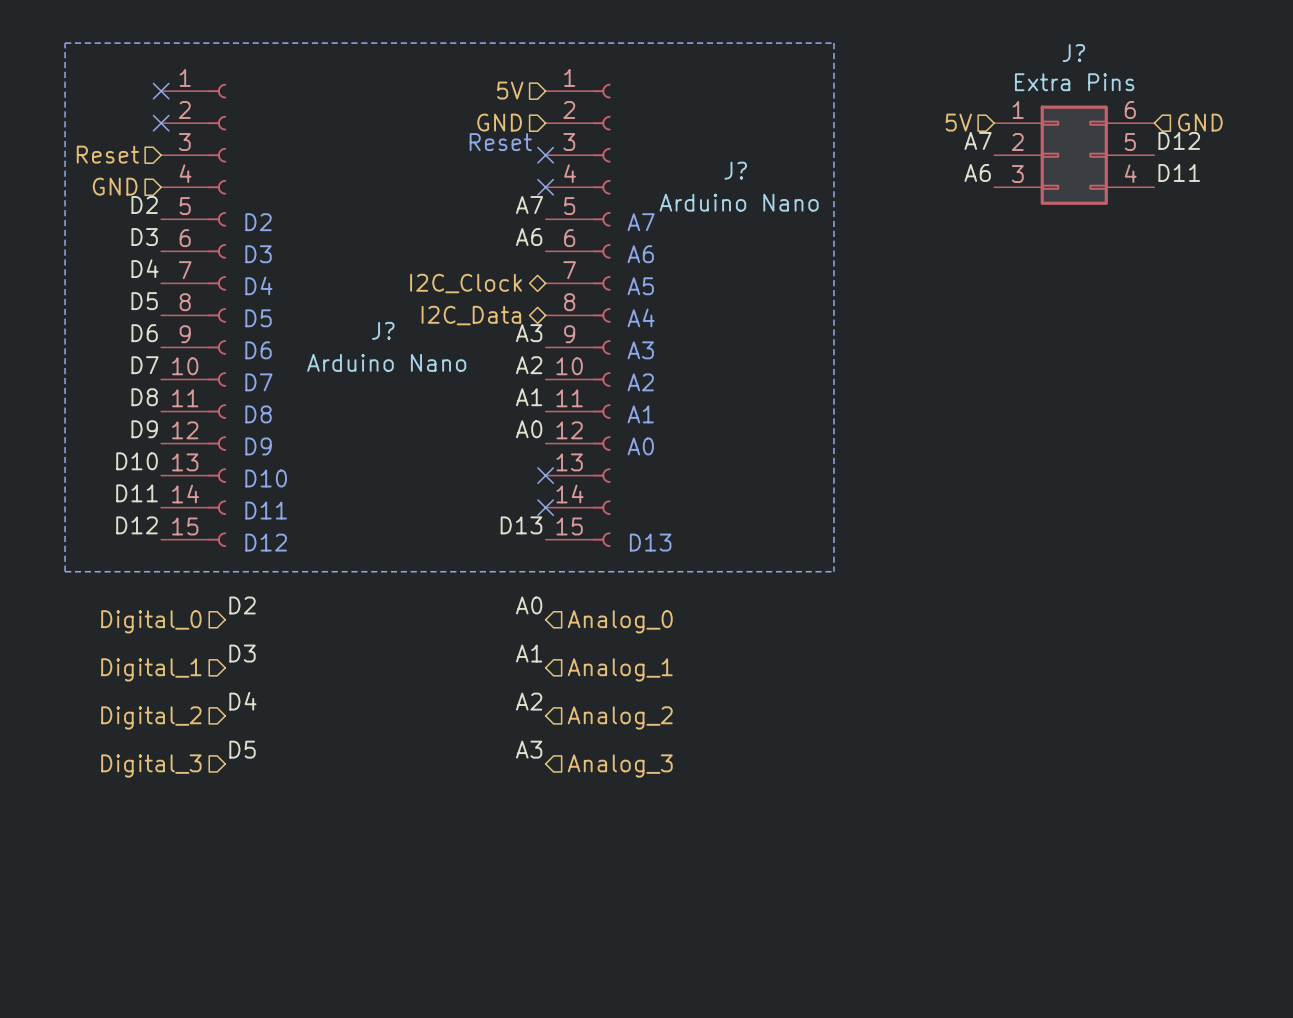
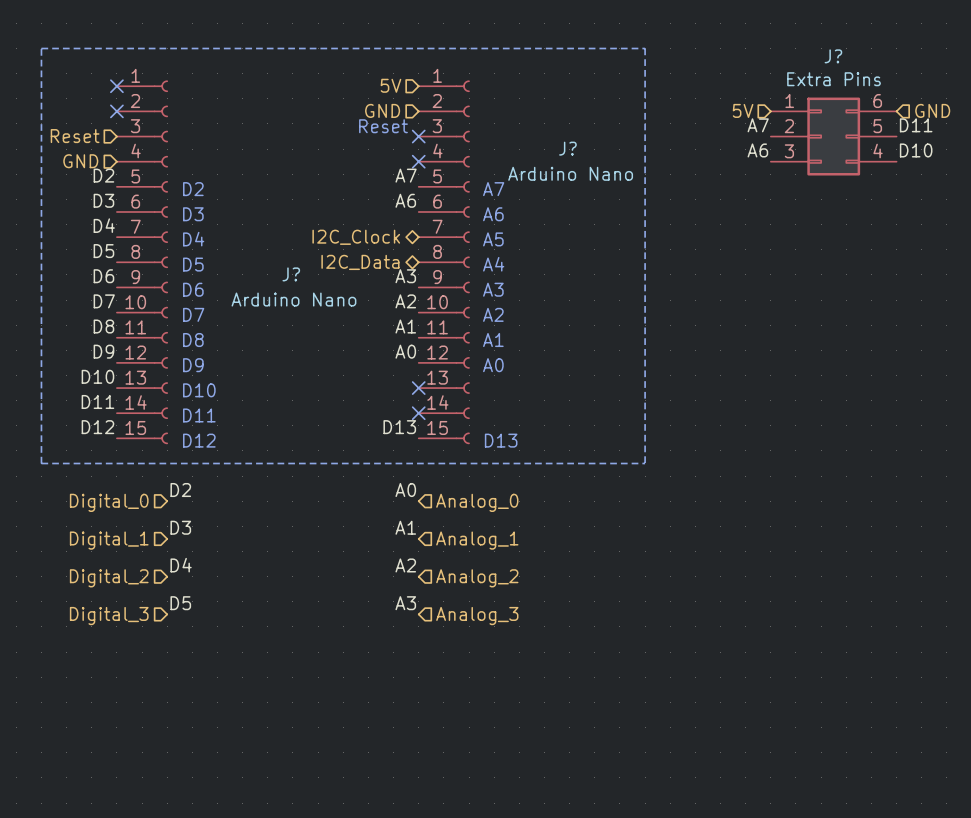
label: D12 (1179, 140) -> D11 (916, 125)
label: D11 (1179, 172) -> D10 (916, 150)

